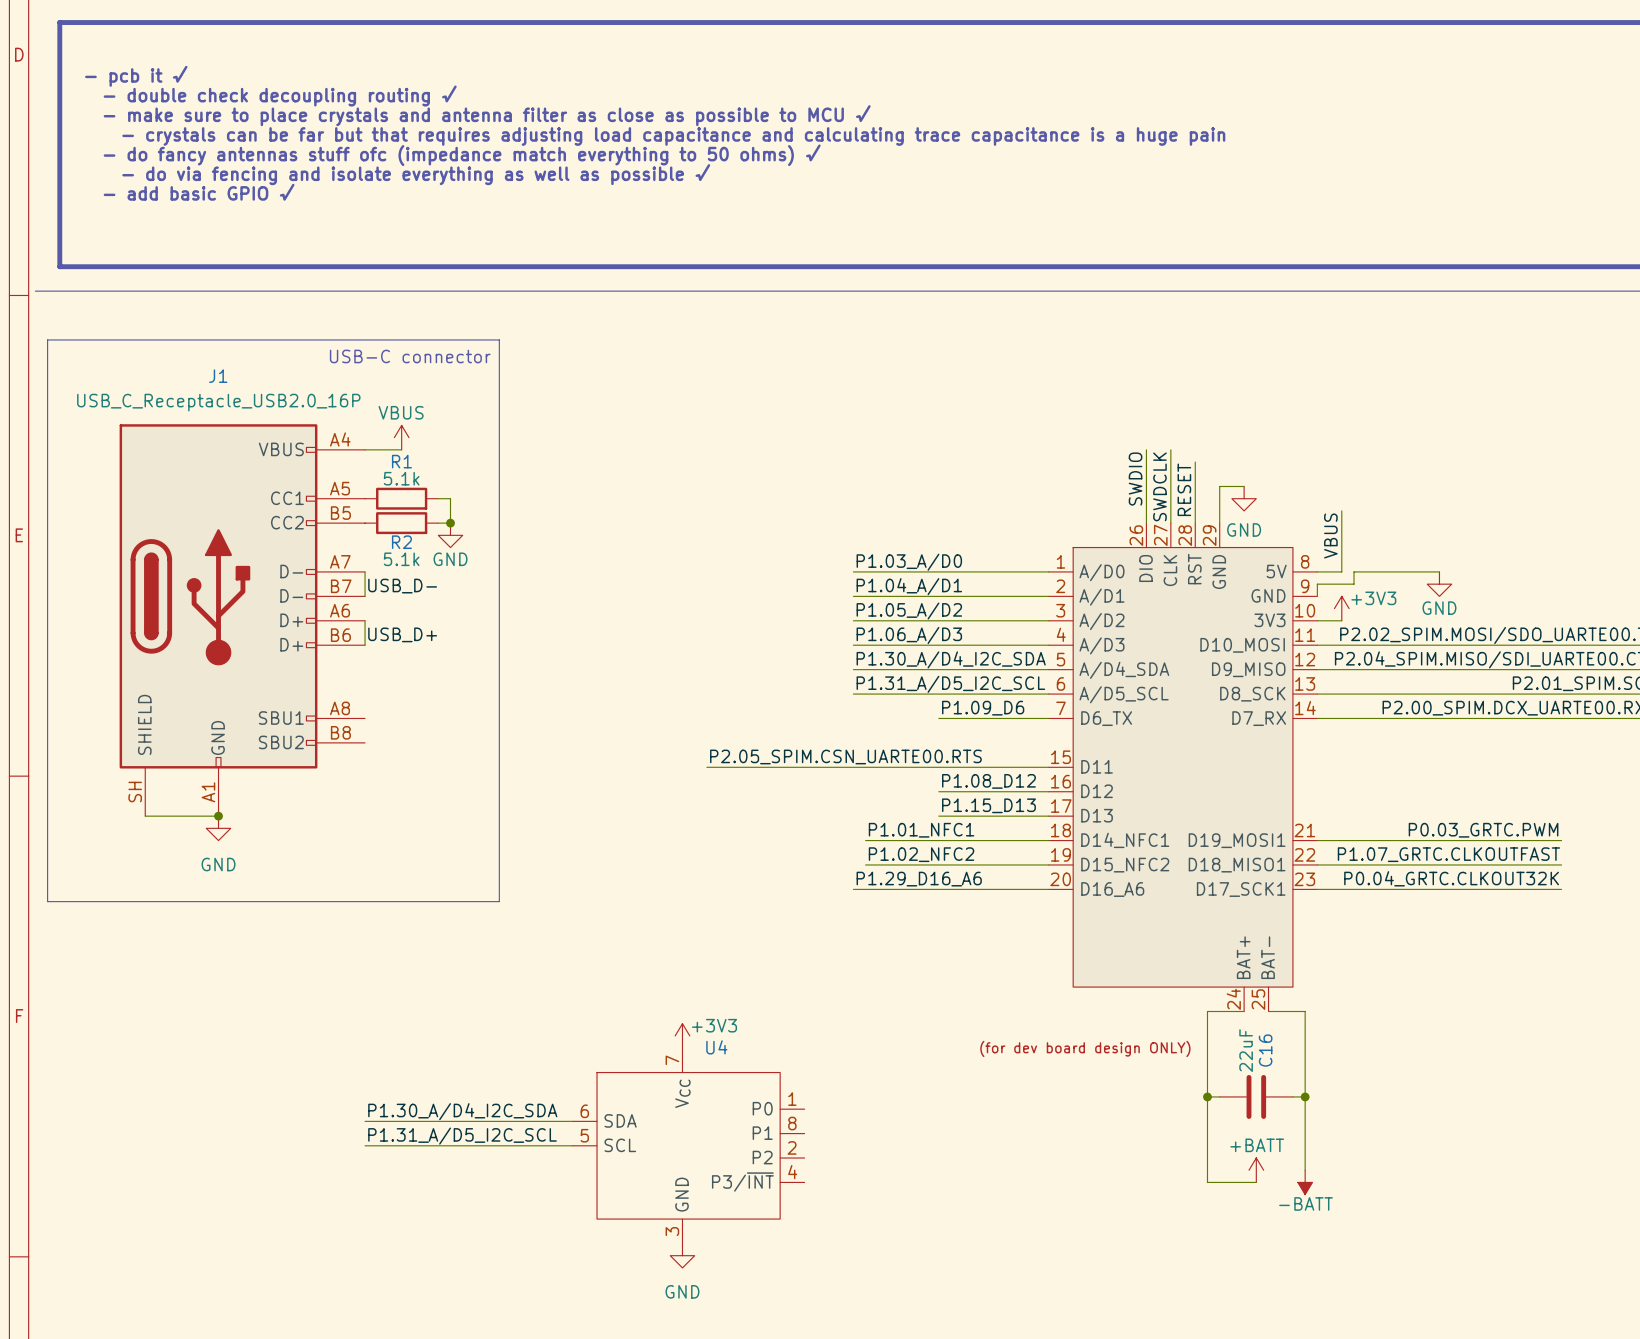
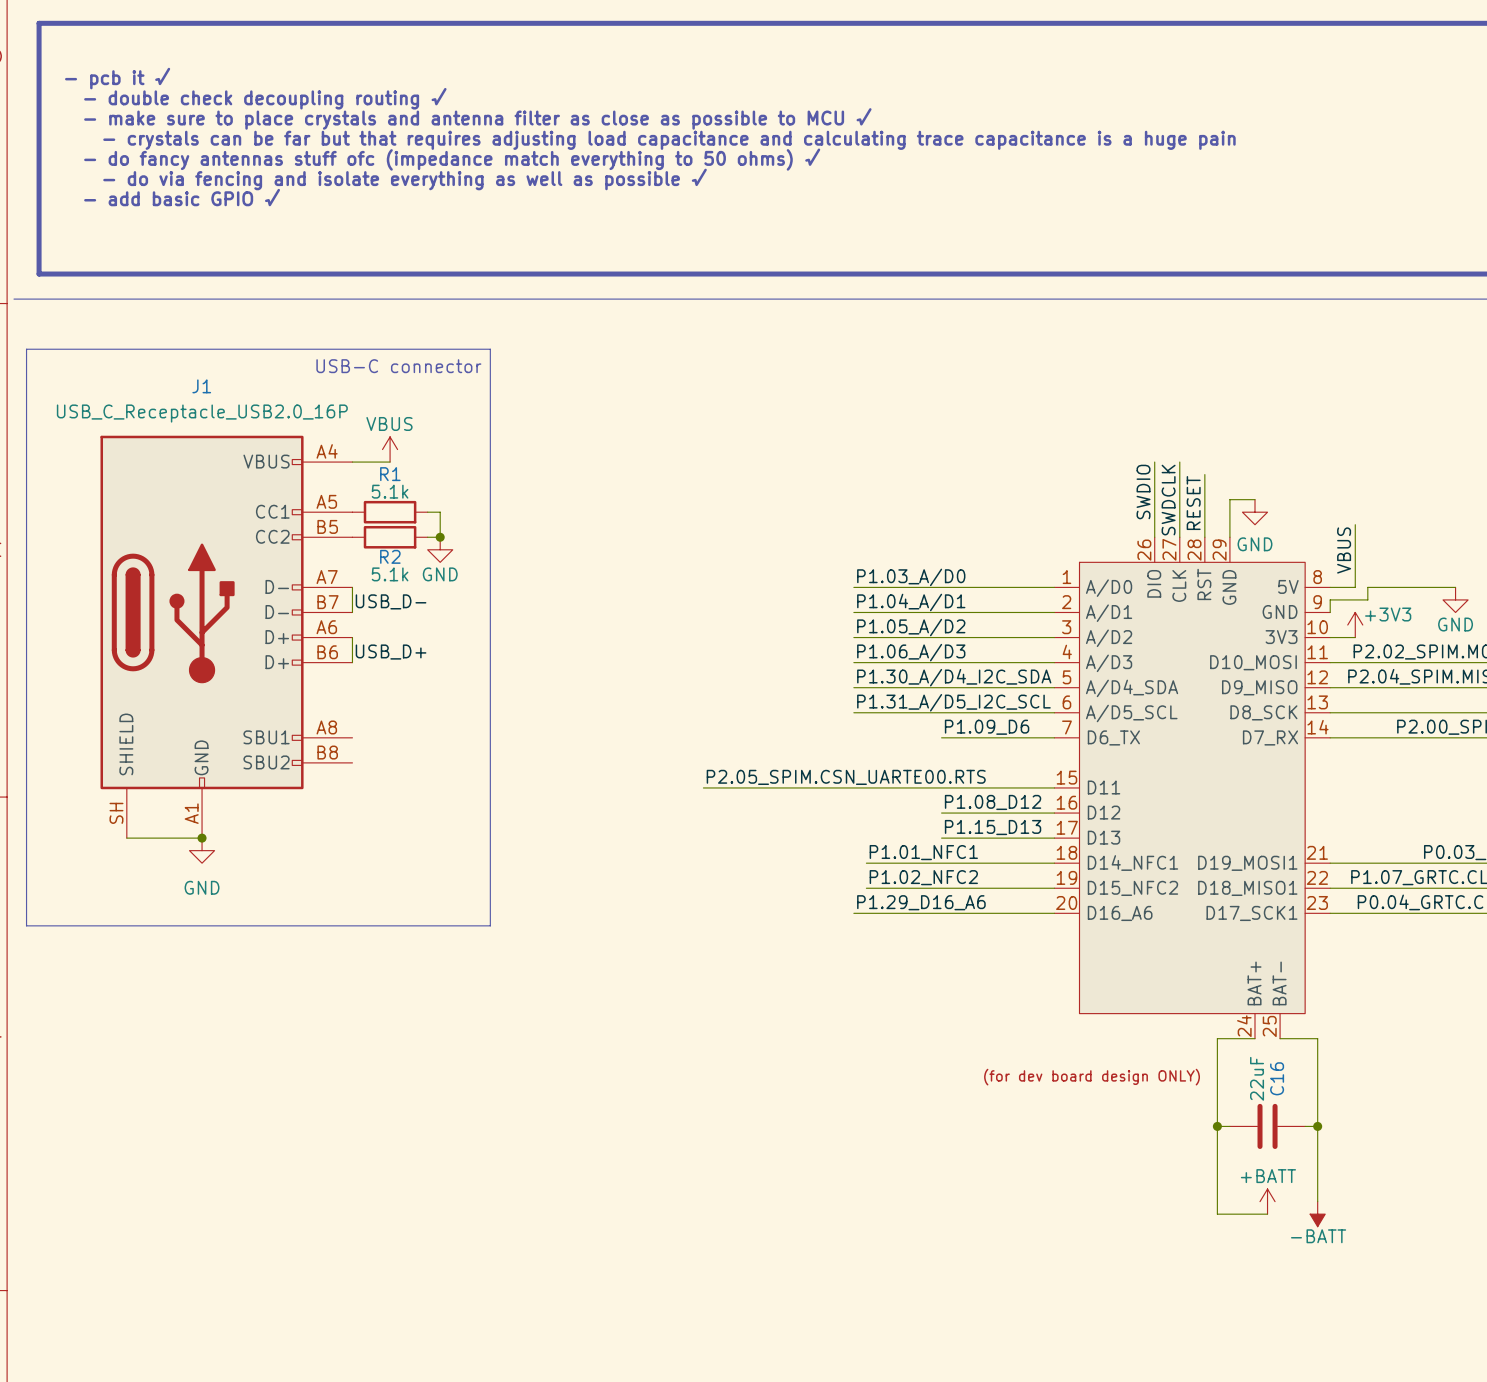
power symbol: +3V3 (682, 1035) -> none
label: P1.30_A/D4_I2C_SDA (462, 1111) -> none
wire: (365, 1121) (572, 1121) -> none
label: P1.31_A/D5_I2C_SCL (462, 1136) -> none
wire: (365, 1145) (572, 1145) -> none
U4: (688, 1145) -> none
power symbol: GND (682, 1255) -> none

